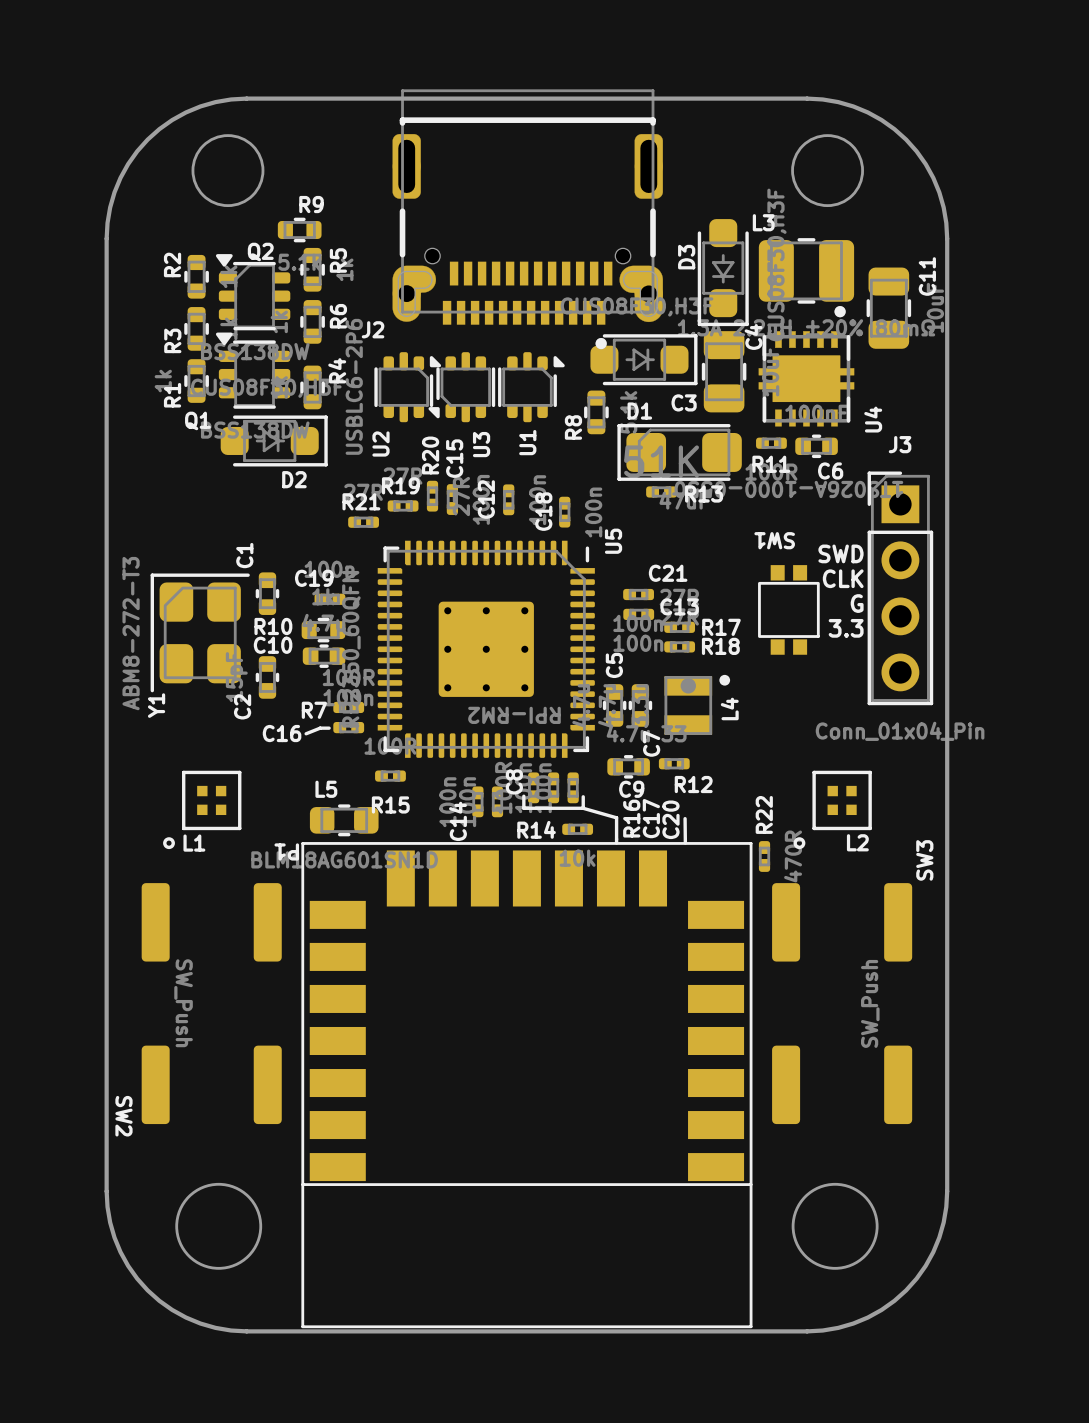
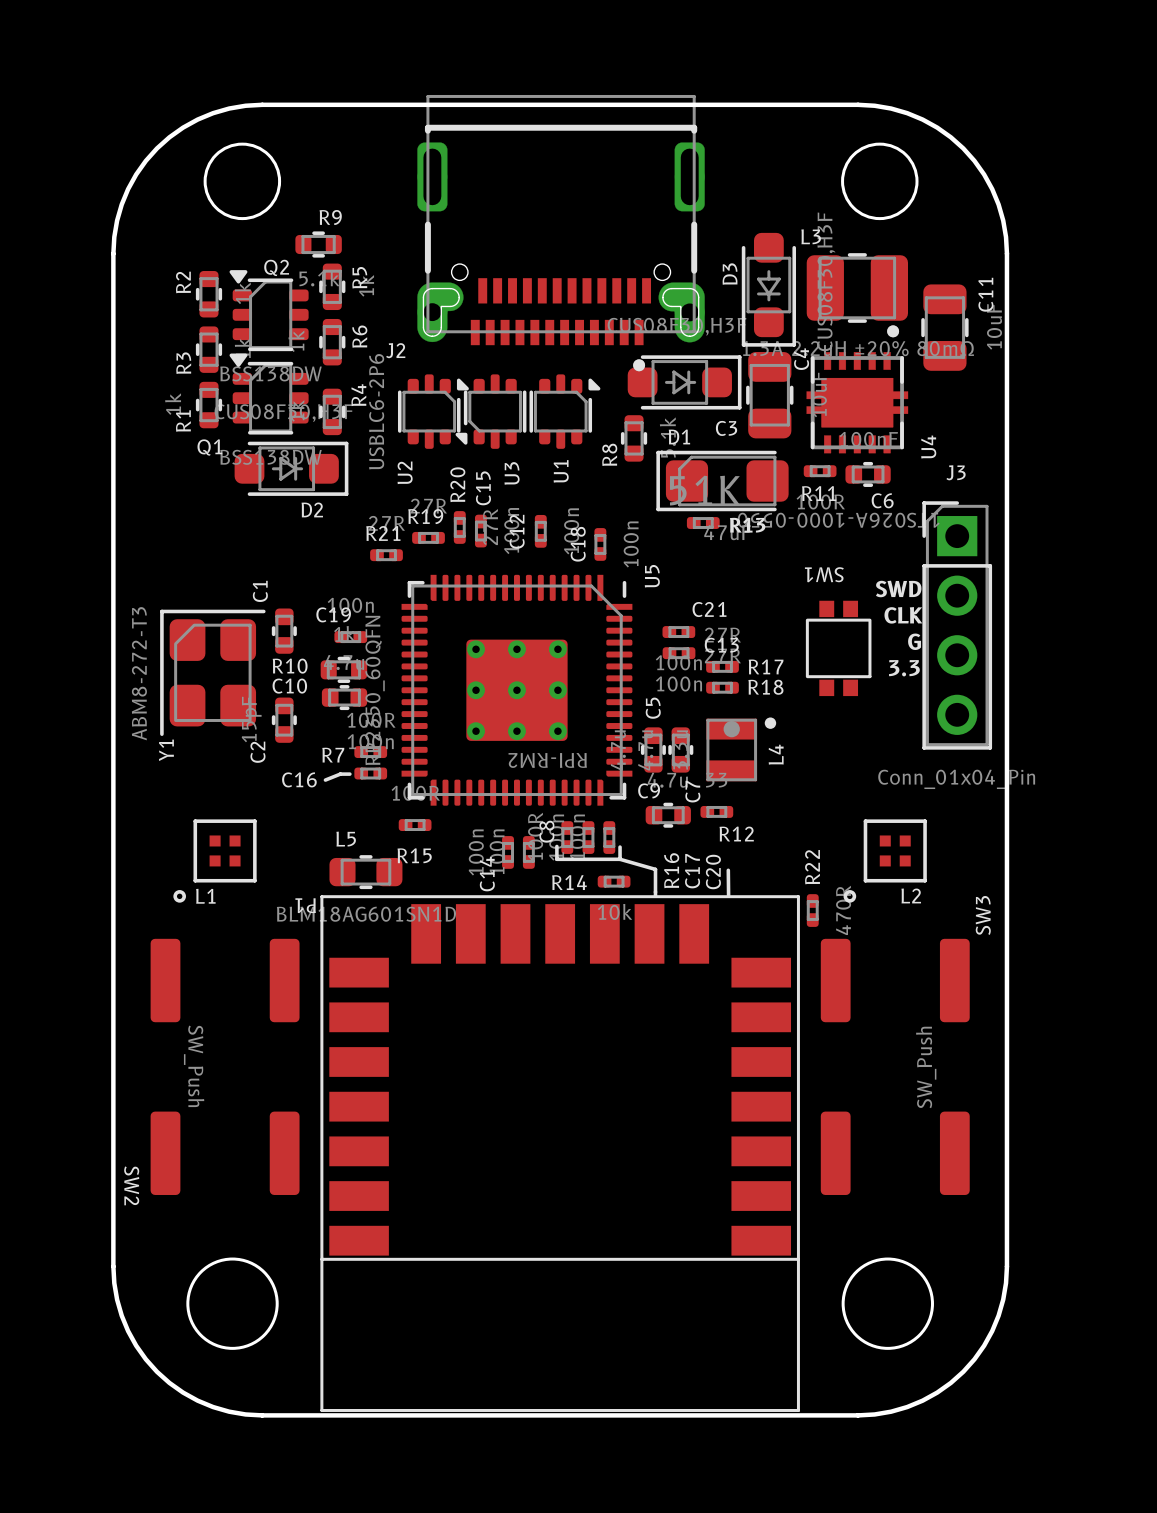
C9 name position: C9 (631, 789) -> C9 (649, 790)

